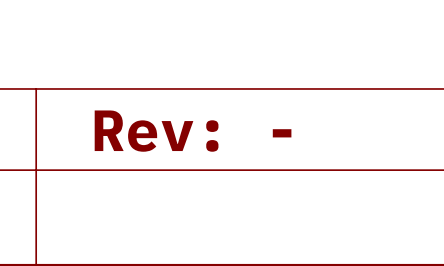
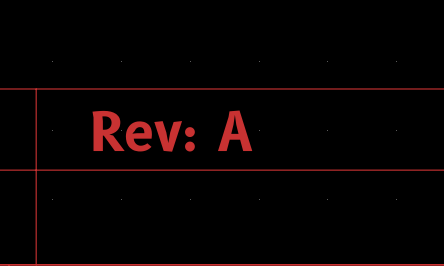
title block: Rev: - (193, 131) -> Rev: A (172, 131)

